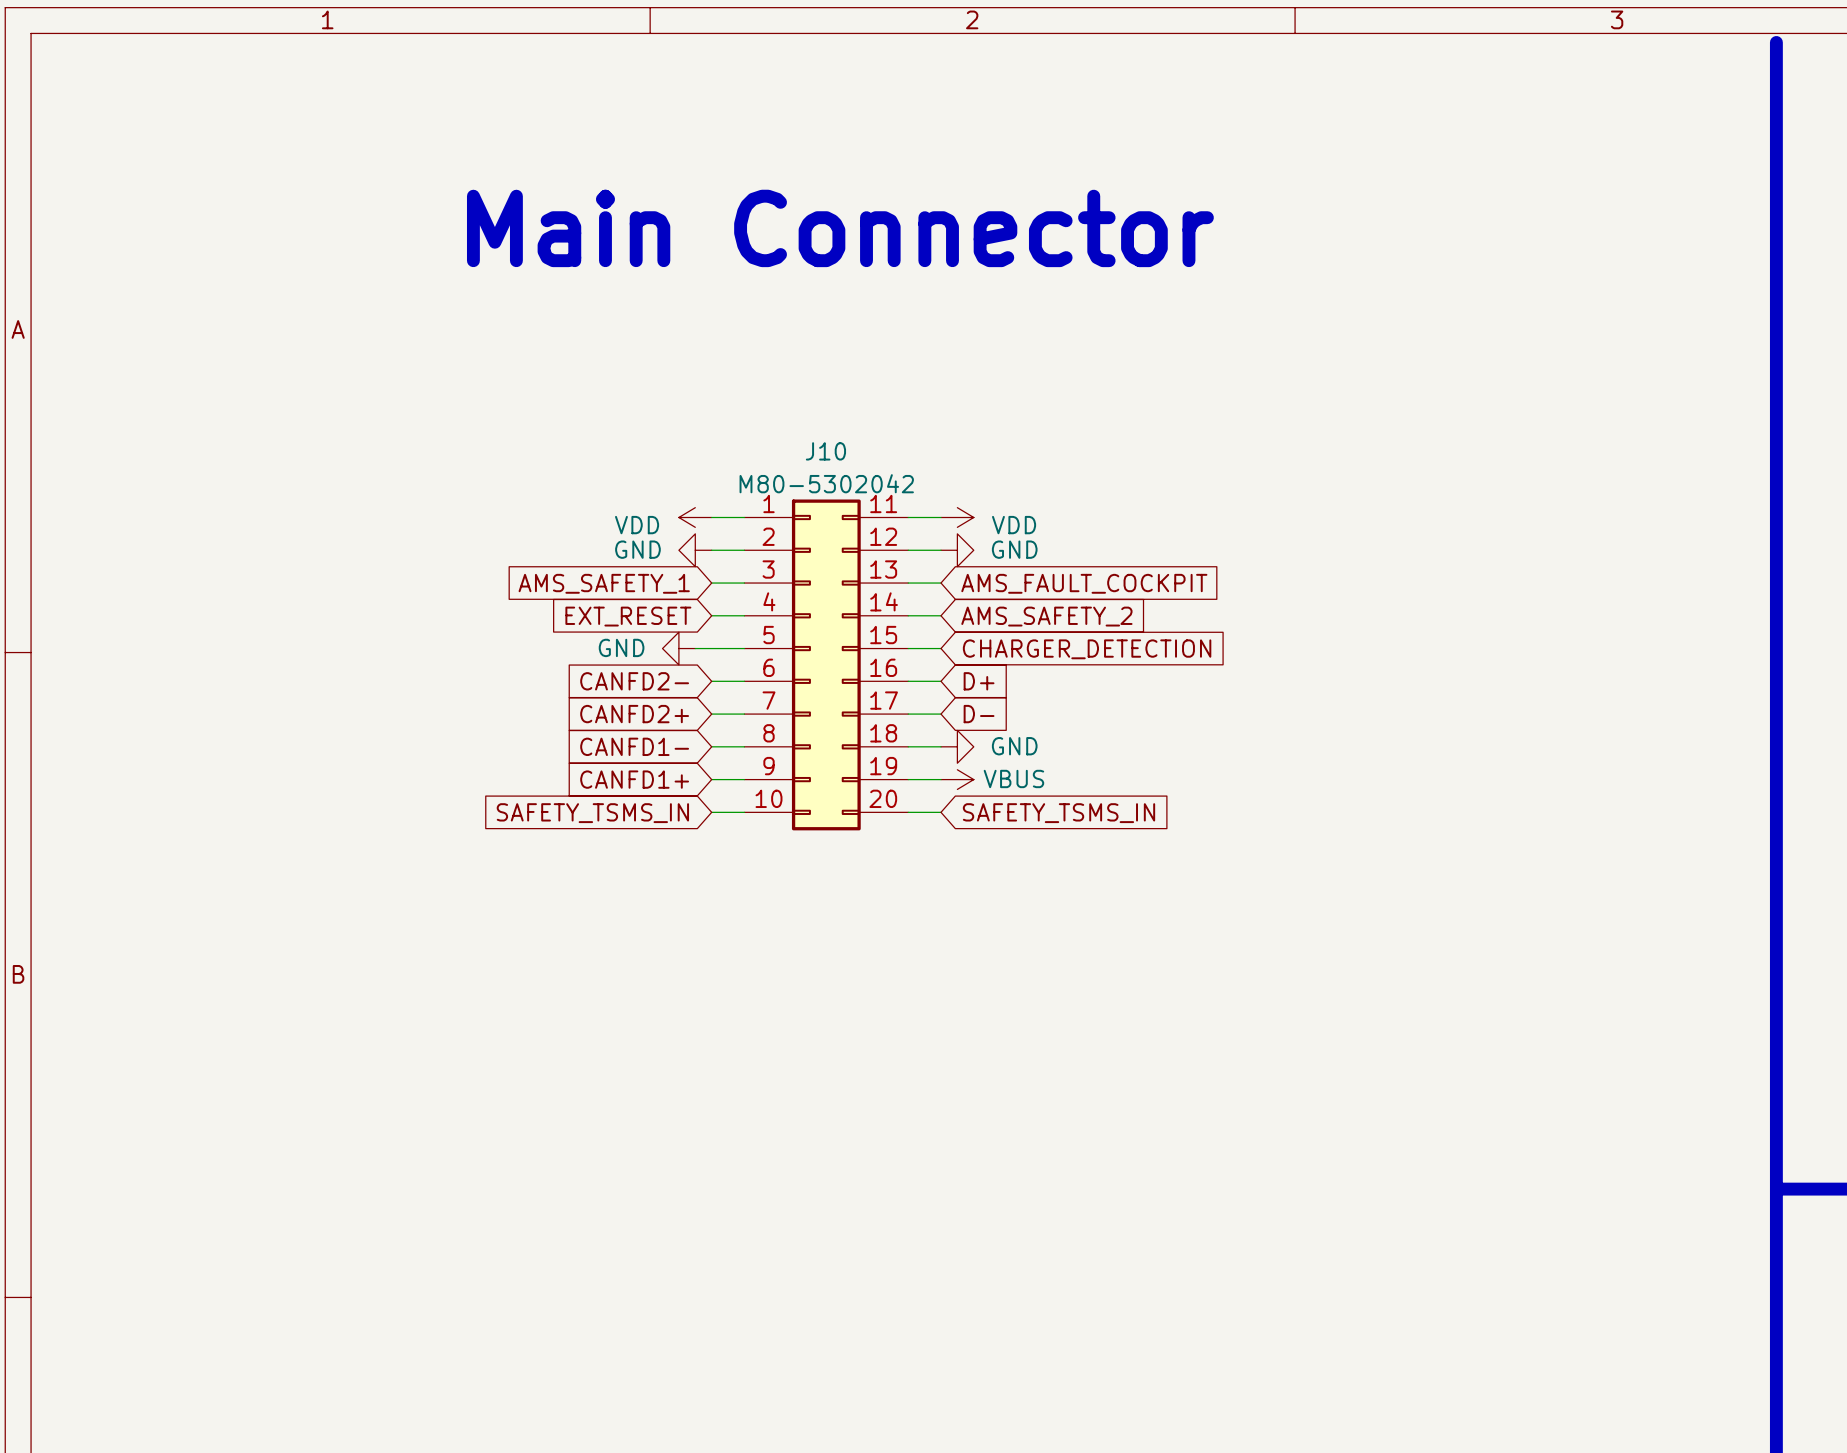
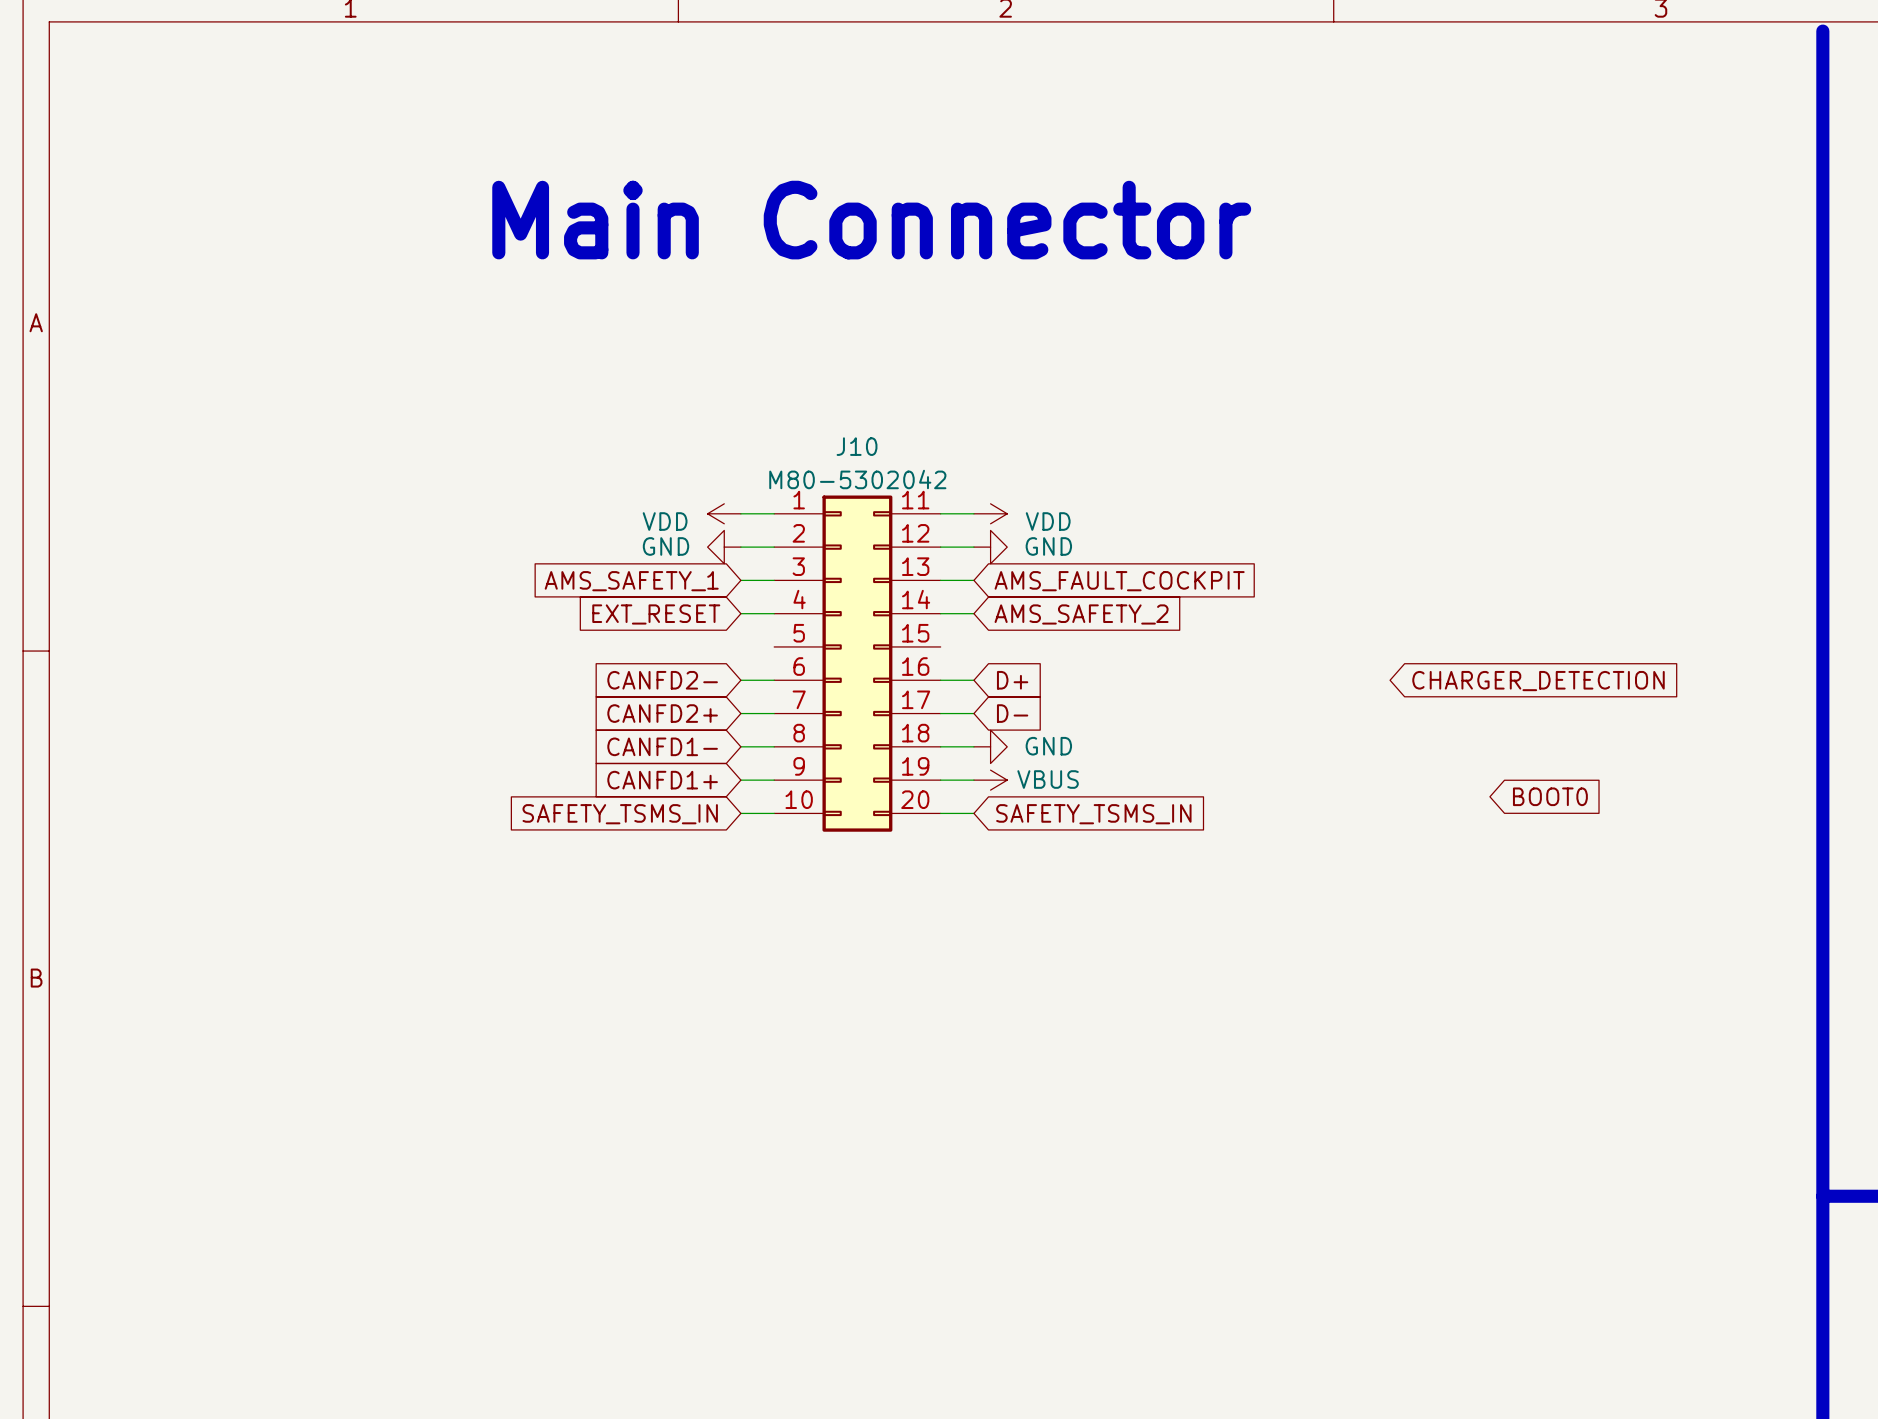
power symbol: GND (678, 648) -> none
wire: (695, 648) (744, 648) -> none
wire: (908, 648) (941, 648) -> none
global label: CHARGER_DETECTION (1087, 649) -> none
global label: none -> CHARGER_DETECTION (1538, 681)
global label: none -> BOOT0 (1550, 796)

